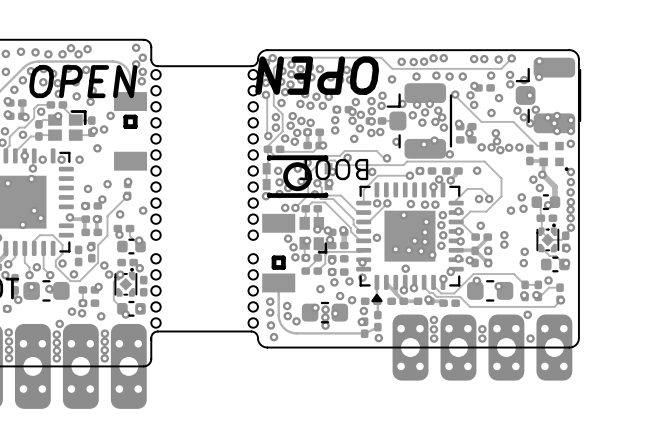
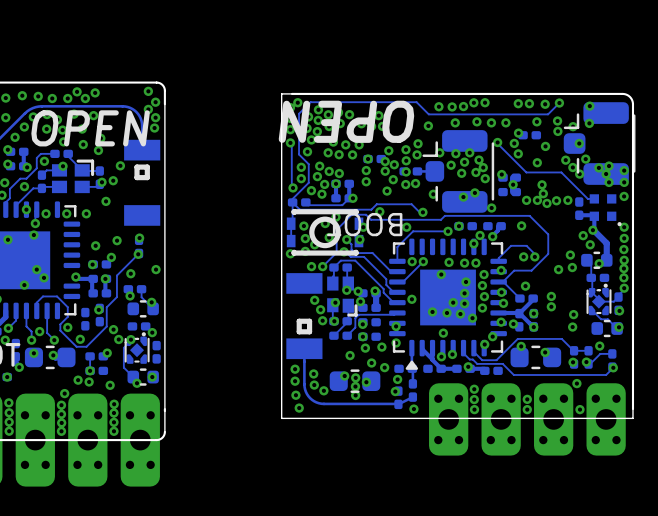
board edge: (267, 50) (260, 52) (257, 62) (252, 66) (157, 66) (153, 64) (151, 59) -> (164, 409) (164, 104)
part: (156, 154) -> none
part: (253, 154) -> none
part: (156, 290) -> none
part: (253, 290) -> none
board edge: (578, 338) (576, 344) (569, 347) (267, 347) (260, 344) (256, 334) (251, 331) (157, 331) (153, 333) (151, 338) -> (632, 409) (632, 418) (281, 418) (281, 93) (292, 93)

